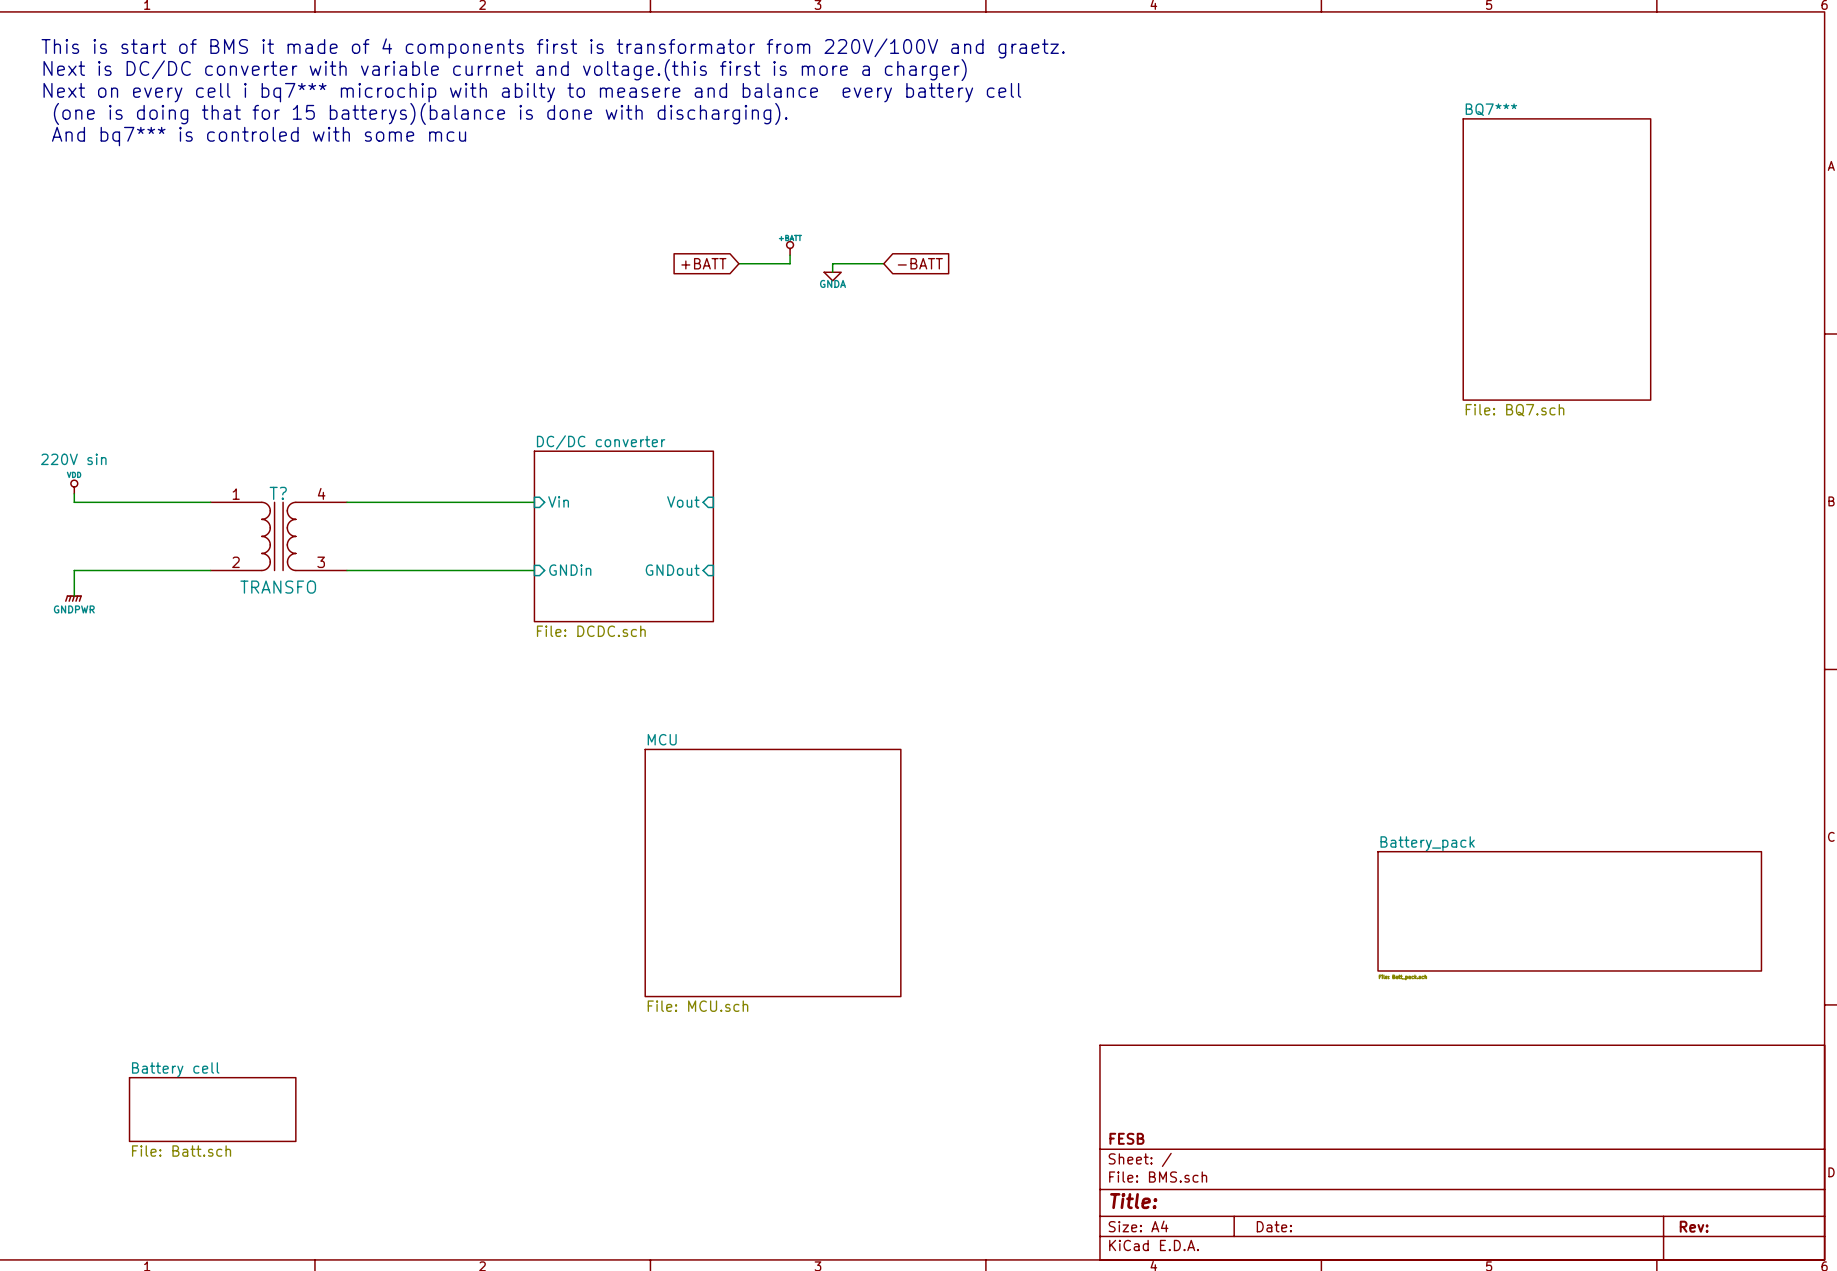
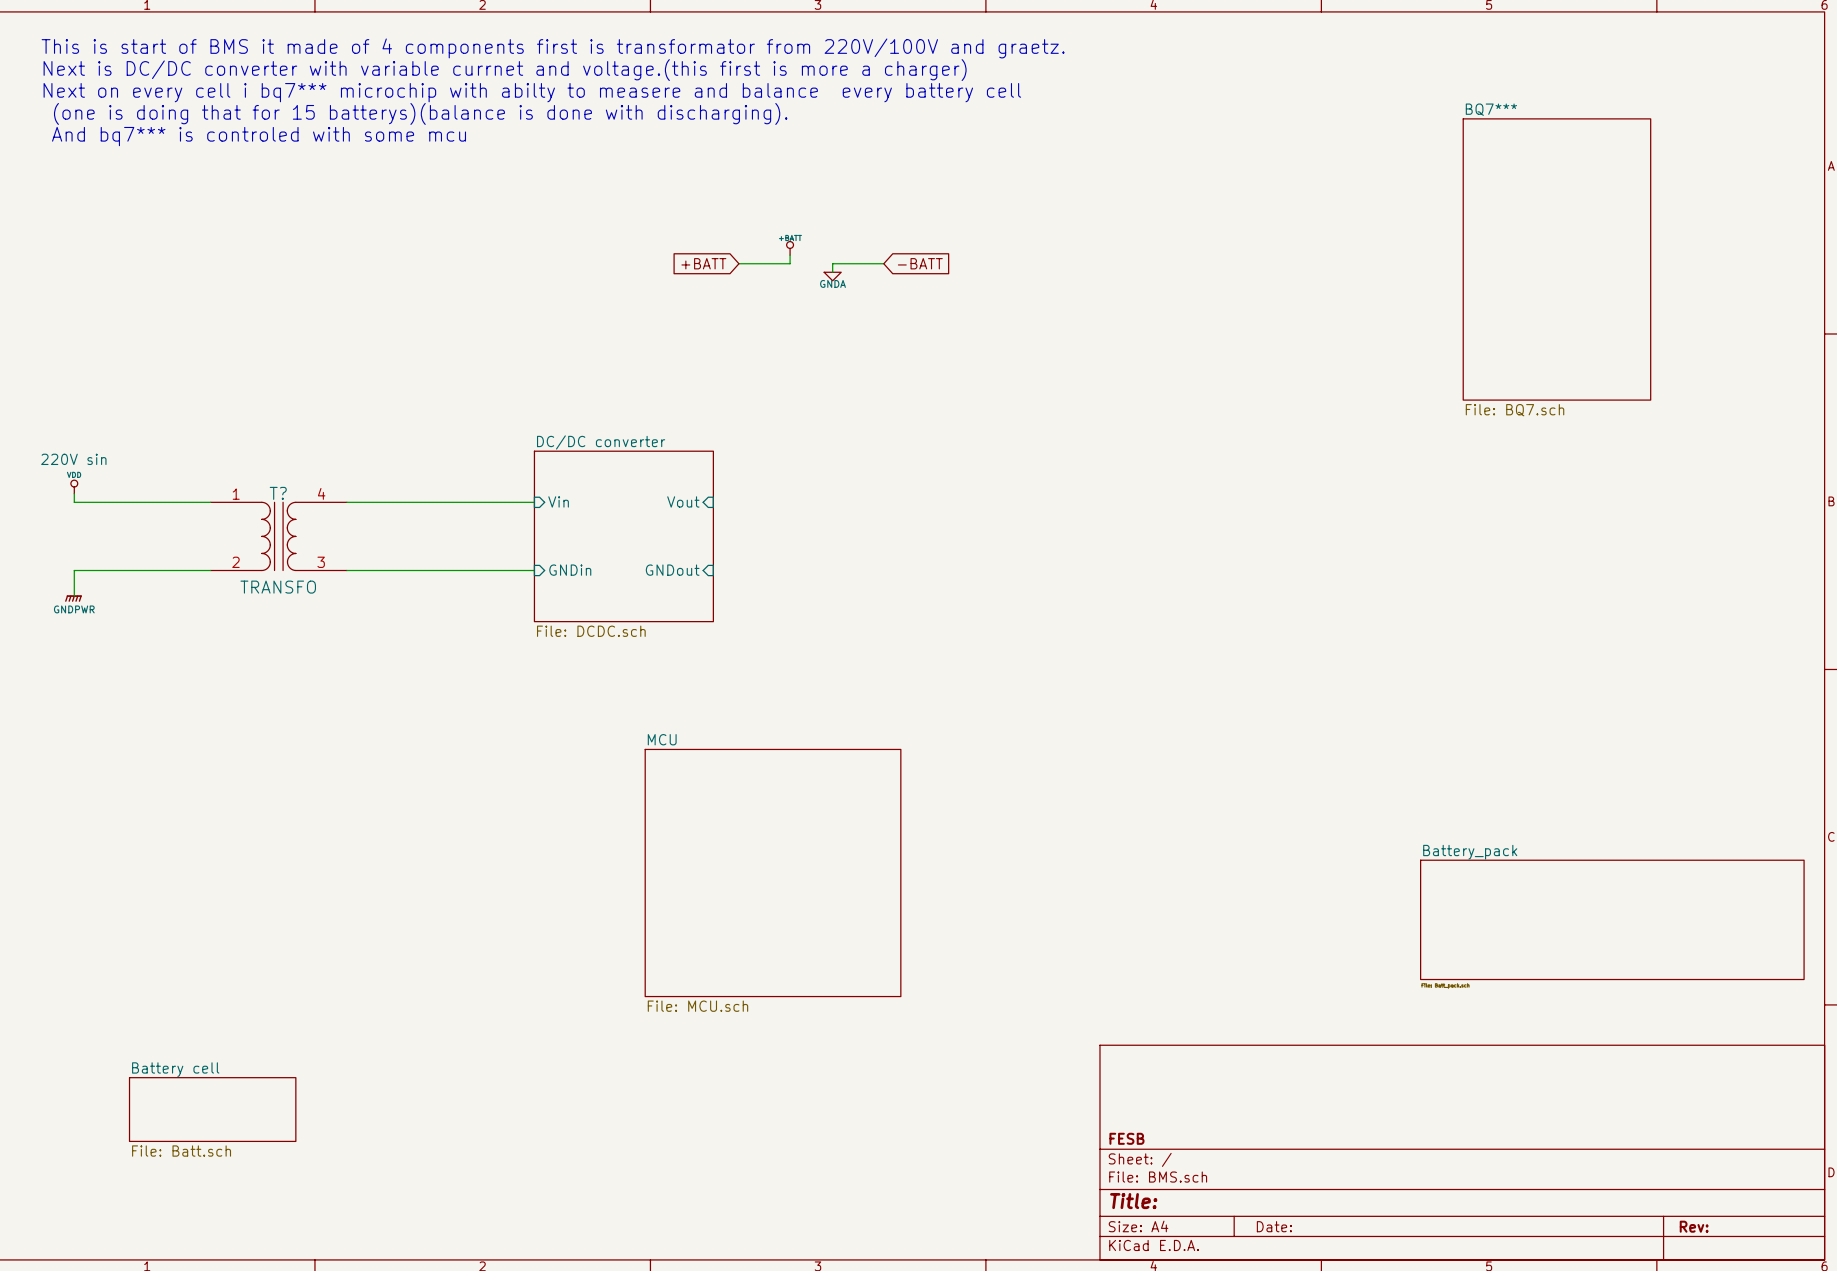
sheet Battery_pack position: (1569, 911) -> (1612, 919)

